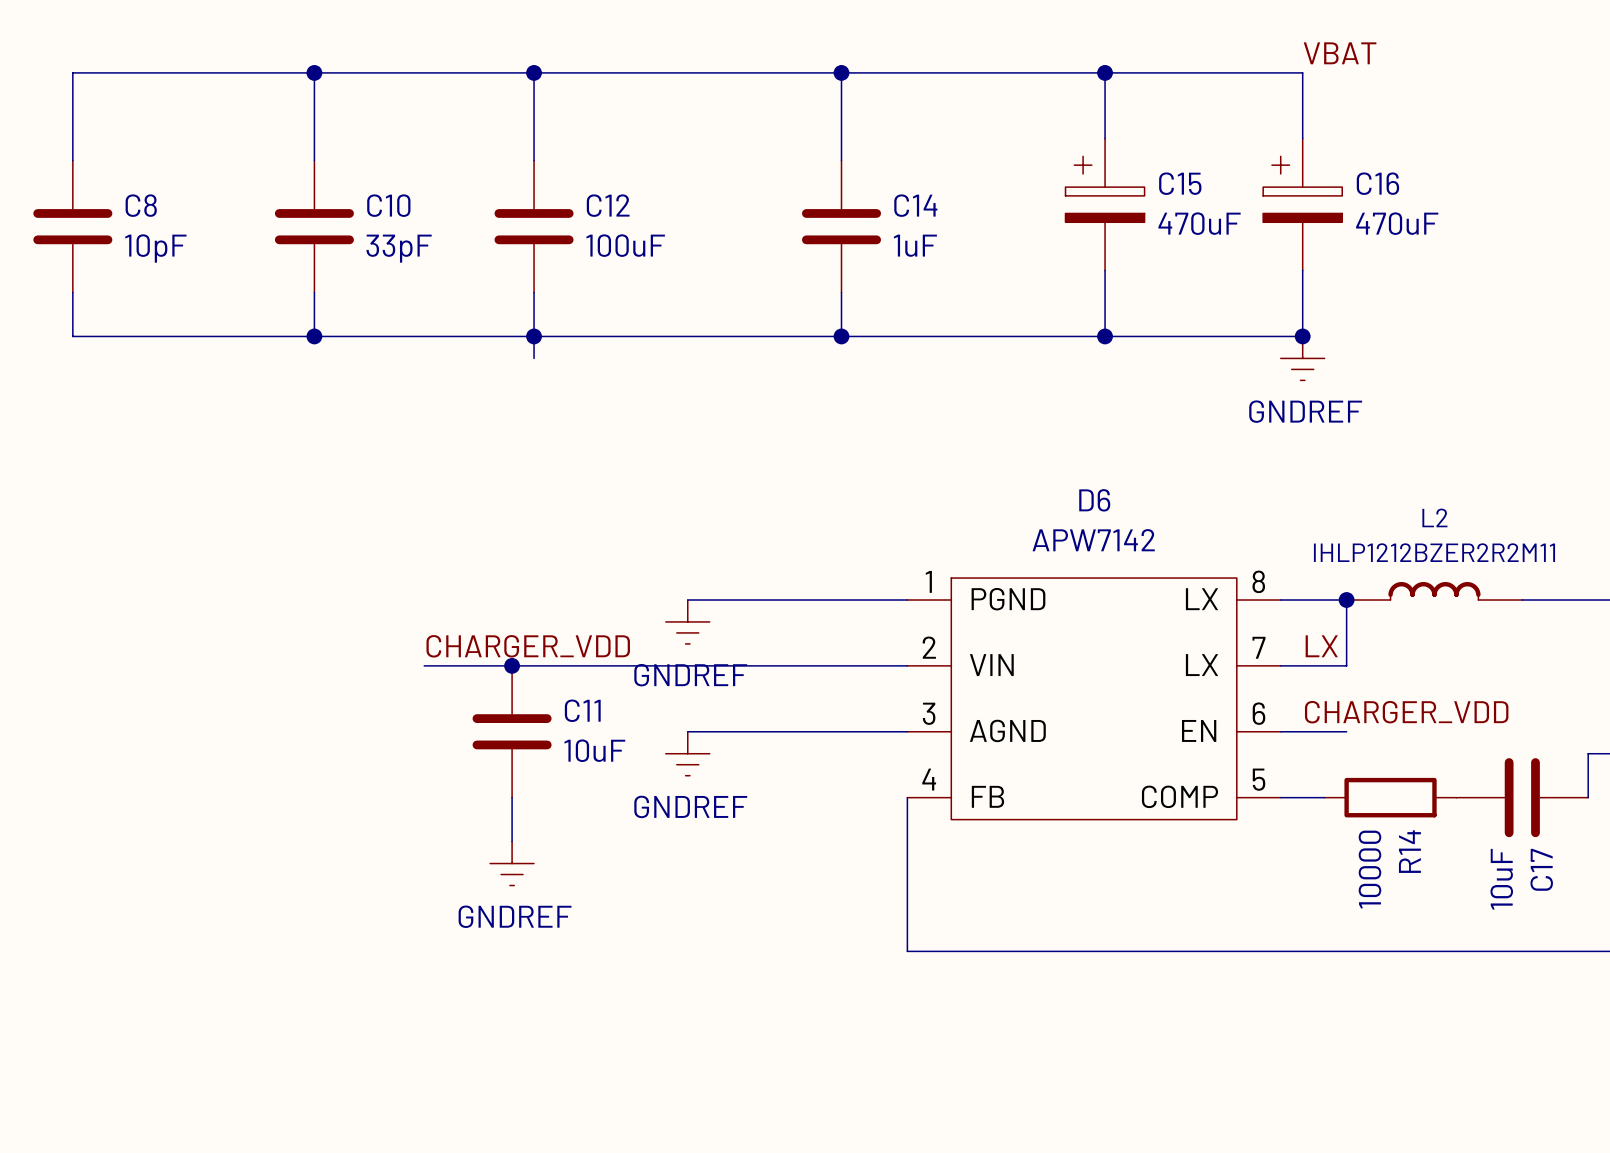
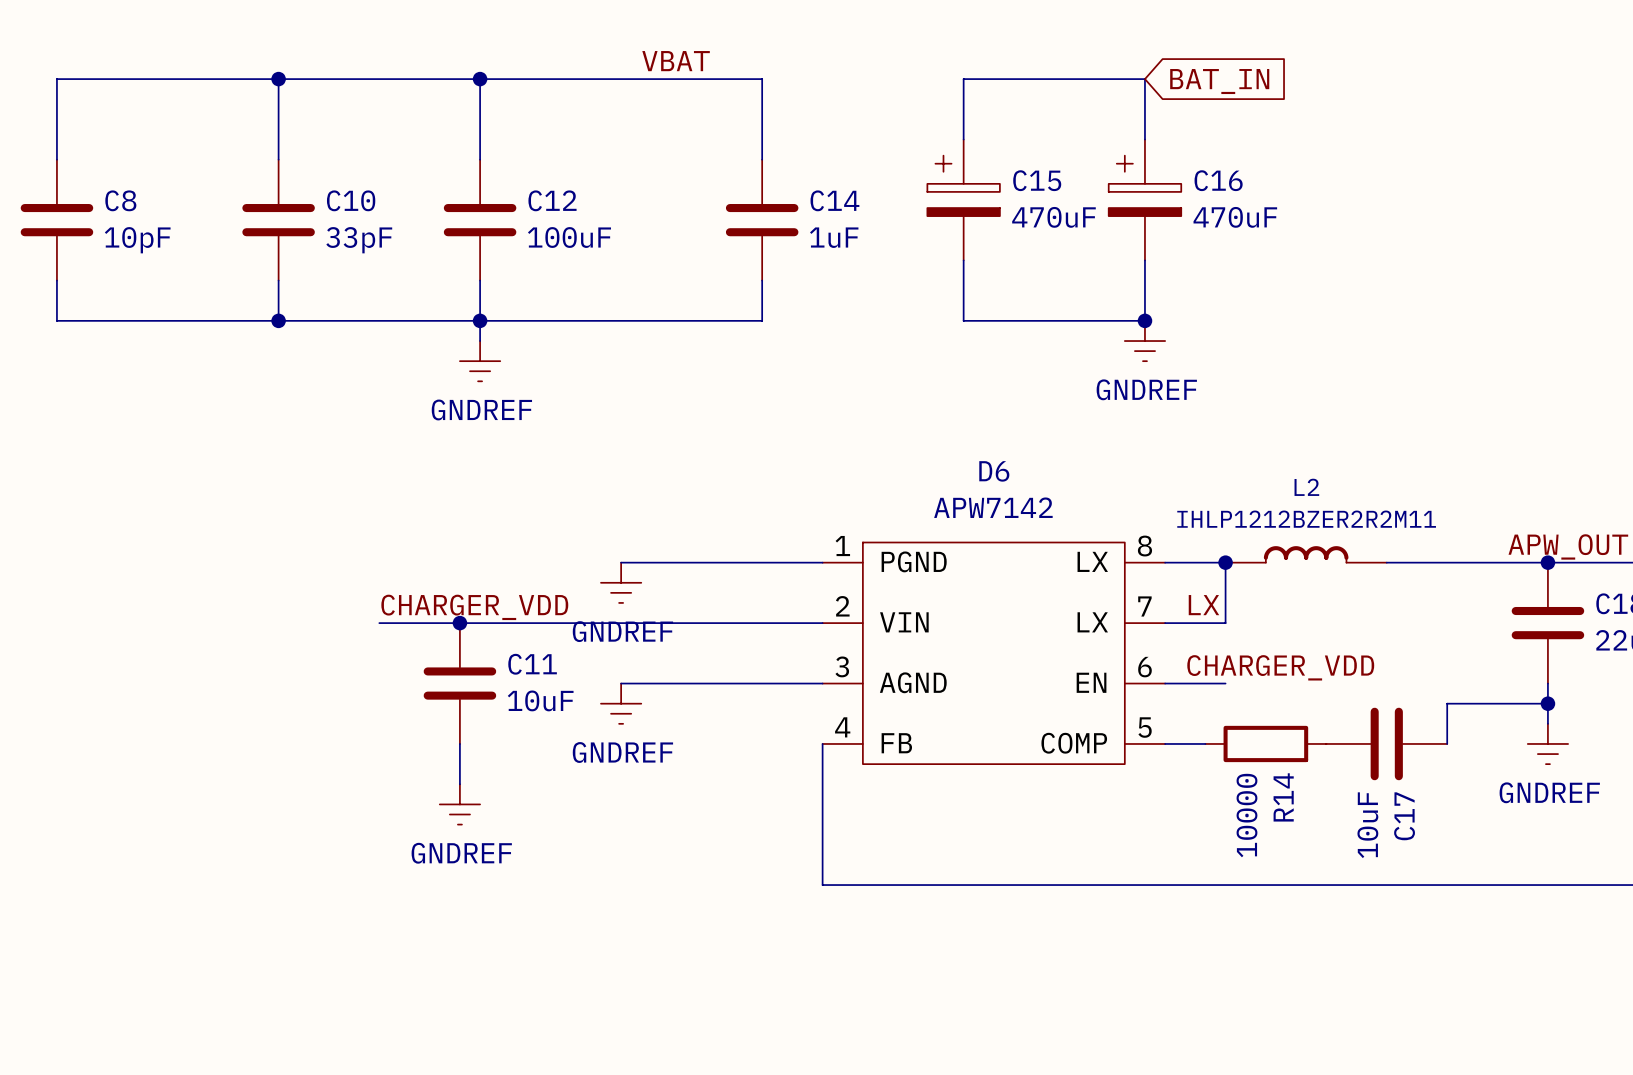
label: none -> VBAT (676, 61)
label: VBAT (1340, 53) -> none
wire: (841, 72) (1061, 72) -> (963, 139) (963, 79)
junction: (841, 72) -> none
wire: (1105, 72) (1105, 138) -> none
junction: (1105, 72) -> none
wire: (1258, 72) (1302, 72) (1302, 138) -> (1144, 79) (1144, 139)
global label: none -> BAT_IN (1219, 81)
C15 position: (1105, 204) -> (963, 199)
C16 position: (1302, 204) -> (1144, 199)
wire: (1105, 270) (1105, 336) -> none
wire: (1302, 270) (1302, 336) (1258, 336) -> (1144, 260) (1144, 320)
wire: (841, 336) (1061, 336) -> (963, 260) (963, 320)
junction: (841, 336) -> none
junction: (1105, 336) -> none
junction position: (1302, 336) -> (1144, 320)
power symbol position: GNDREF (1302, 358) -> GNDREF (1144, 341)
power symbol: none -> GNDREF (480, 361)

